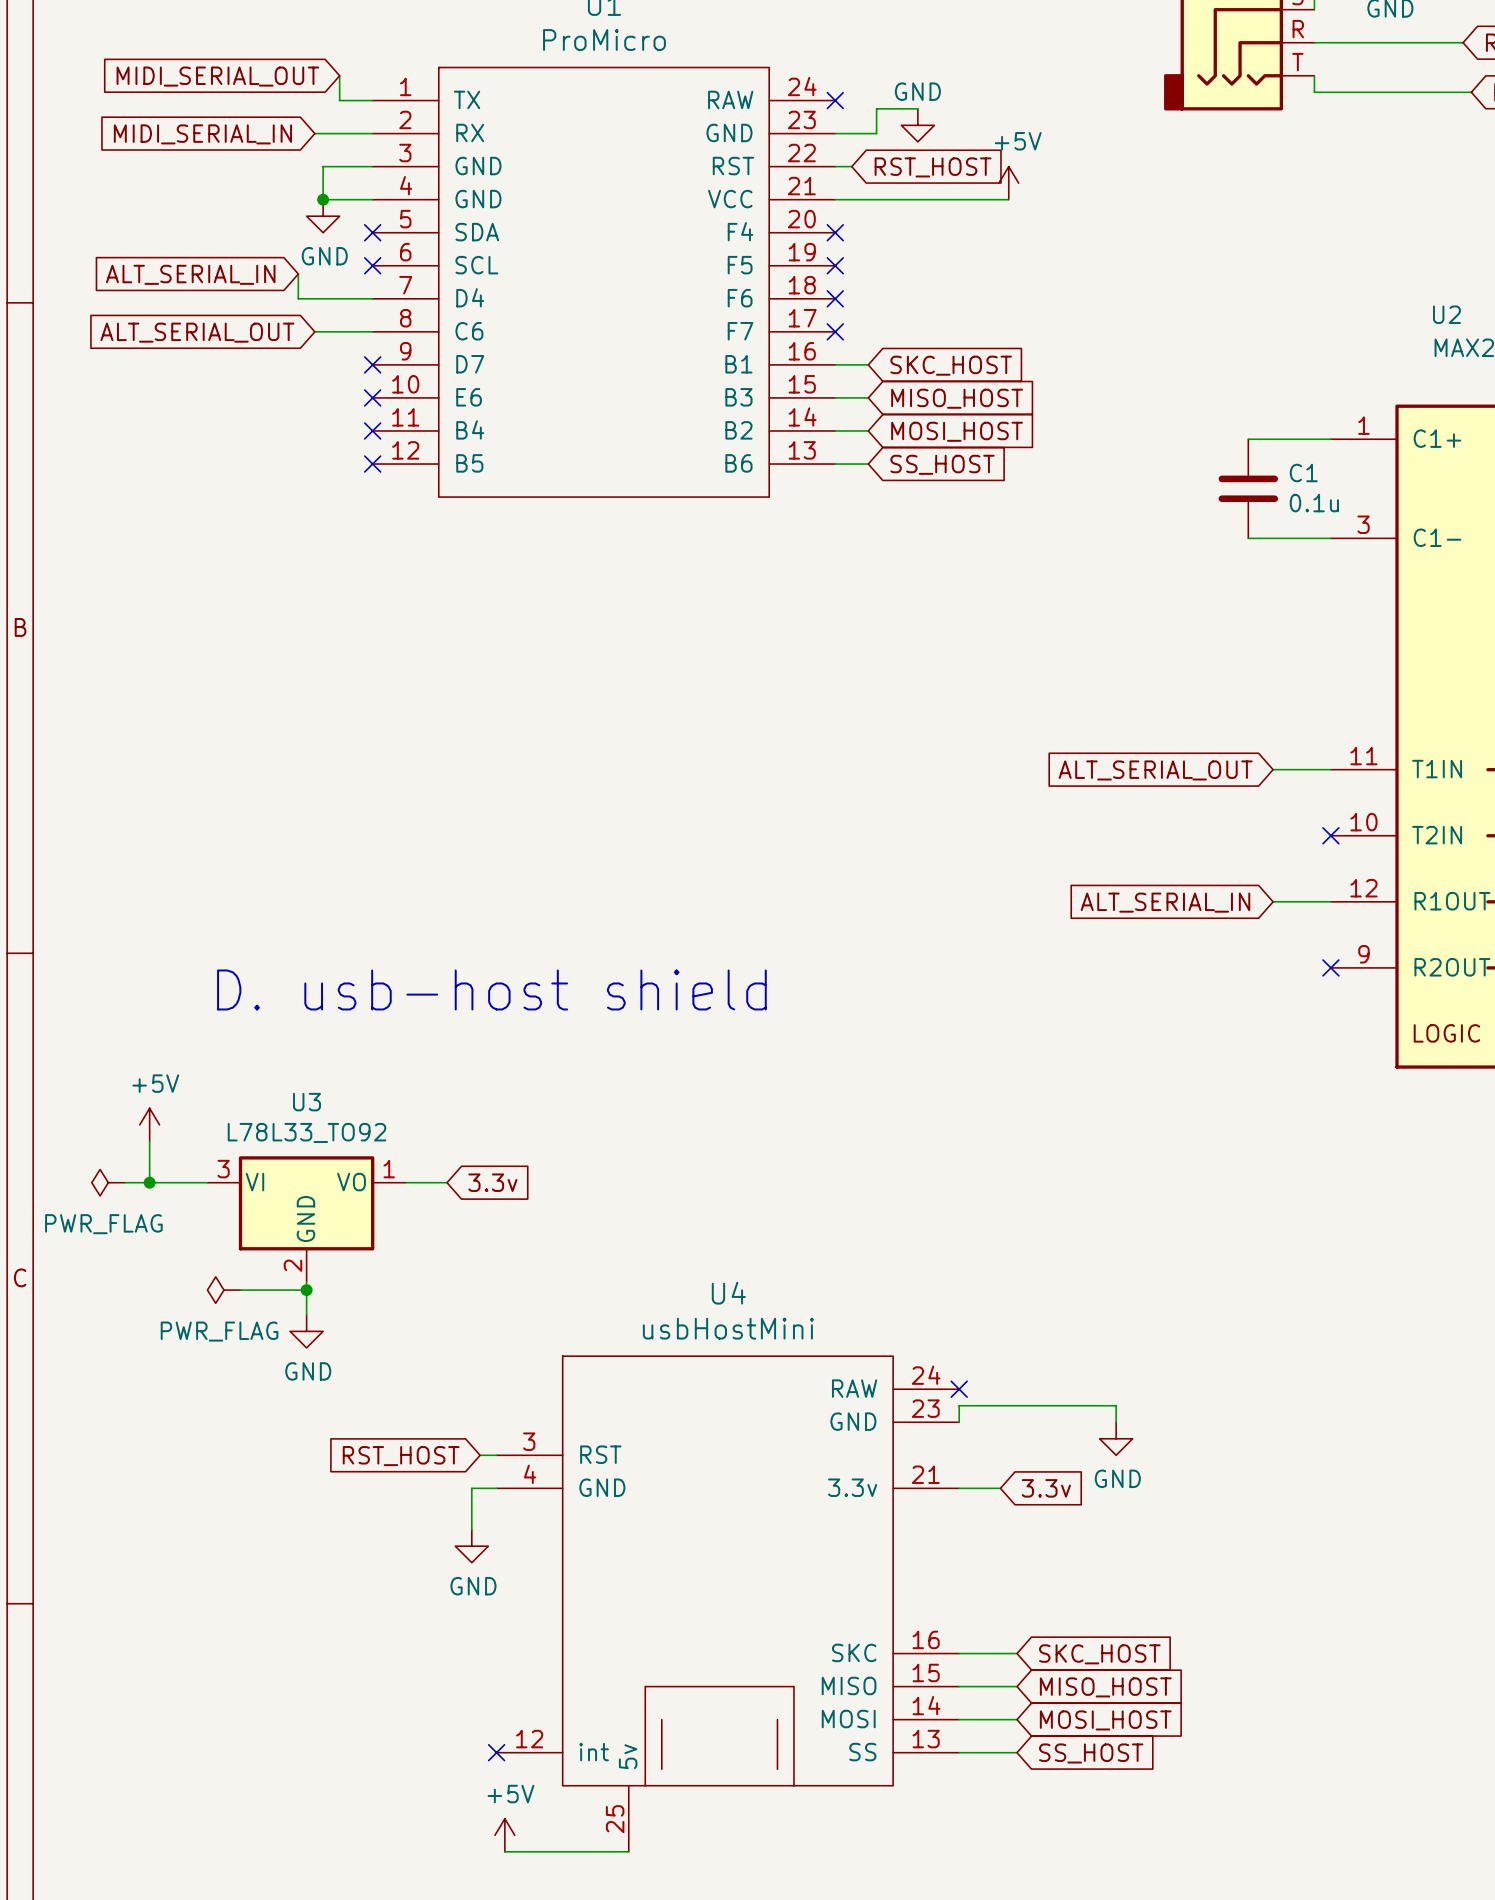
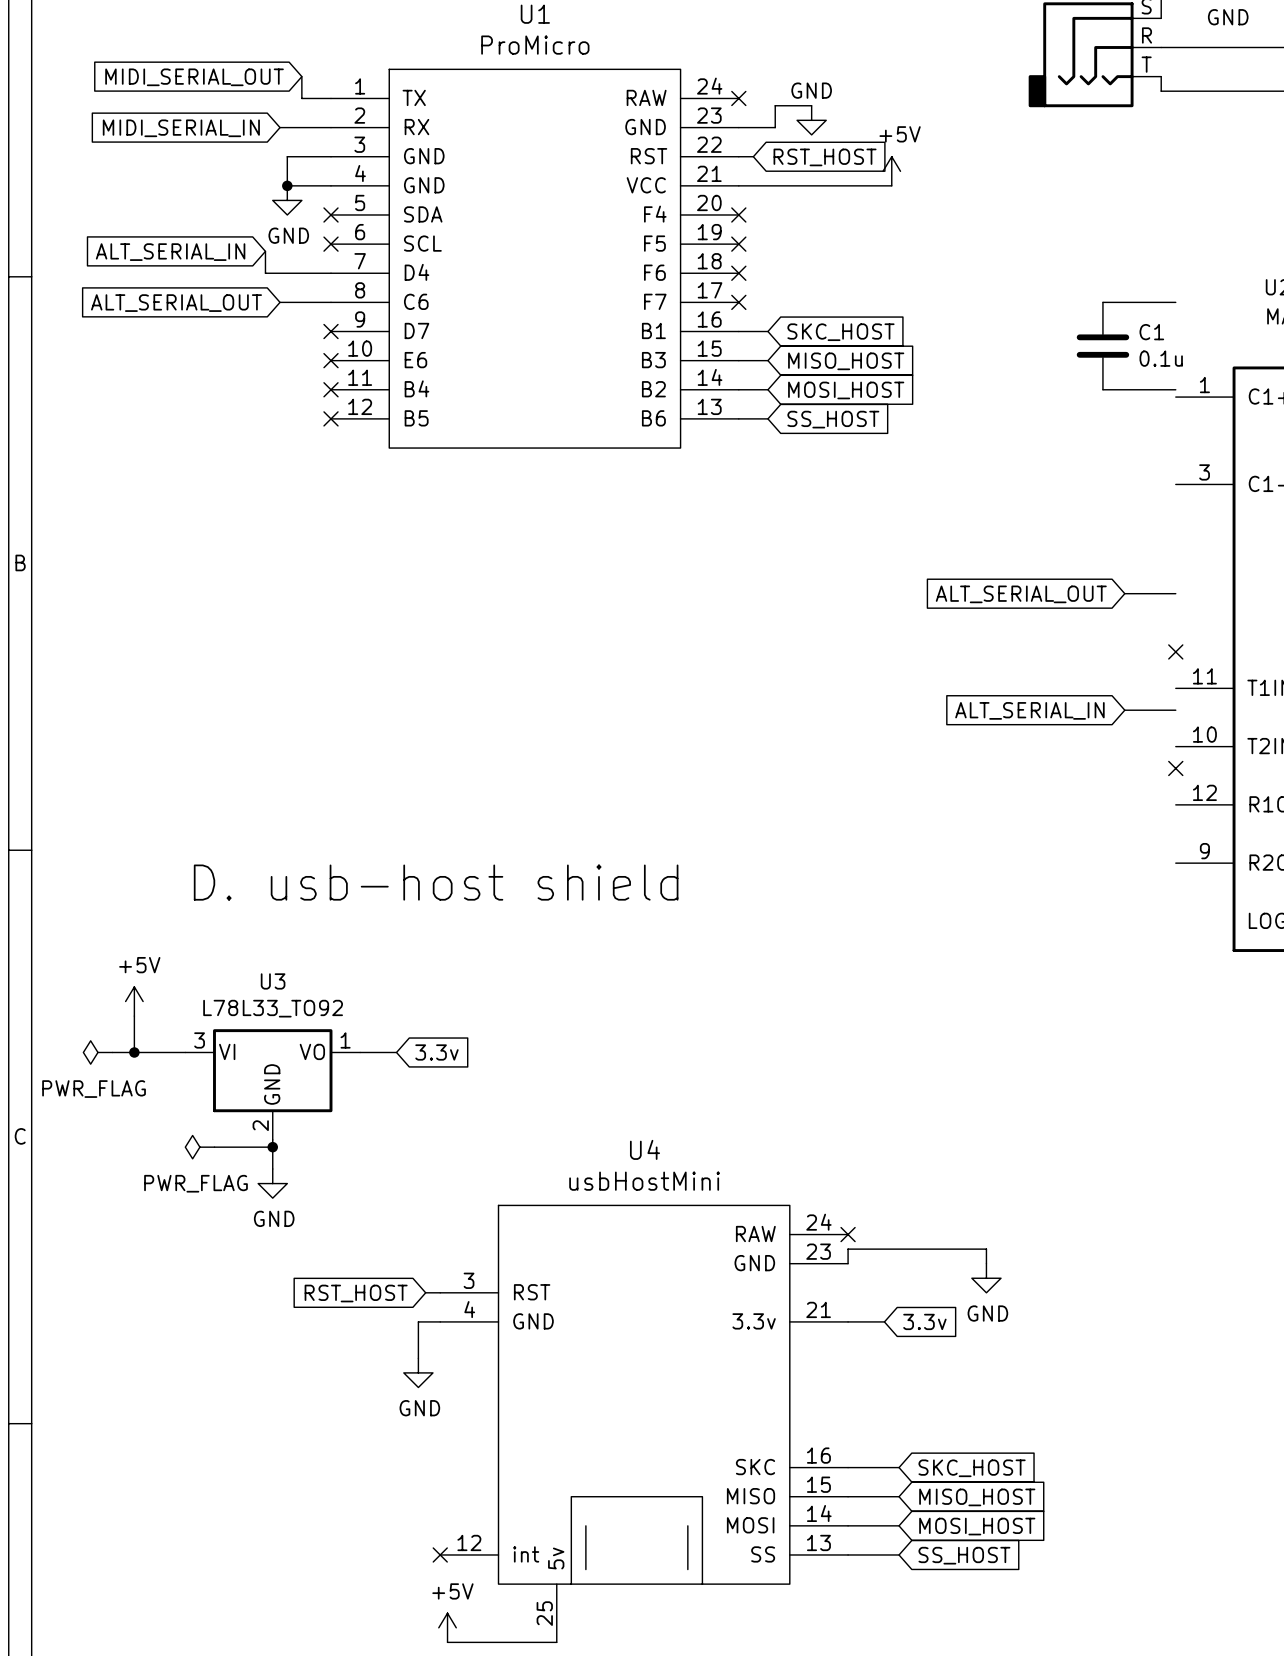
wire: (1248, 439) (1330, 439) -> (1102, 302) (1175, 302)
C1 position: (1248, 488) -> (1102, 346)
wire: (1248, 538) (1330, 538) -> (1102, 389) (1175, 389)
no-connect mark: none -> (1175, 651)
wire: (1273, 769) (1330, 769) -> (1124, 593) (1175, 593)
global label position: ALT_SERIAL_OUT (1155, 770) -> ALT_SERIAL_OUT (1021, 594)
no-connect mark position: (1330, 835) -> (1175, 768)
wire: (1273, 901) (1330, 901) -> (1124, 710) (1175, 710)
global label position: ALT_SERIAL_IN (1165, 902) -> ALT_SERIAL_IN (1029, 710)
no-connect mark: (1330, 967) -> none

